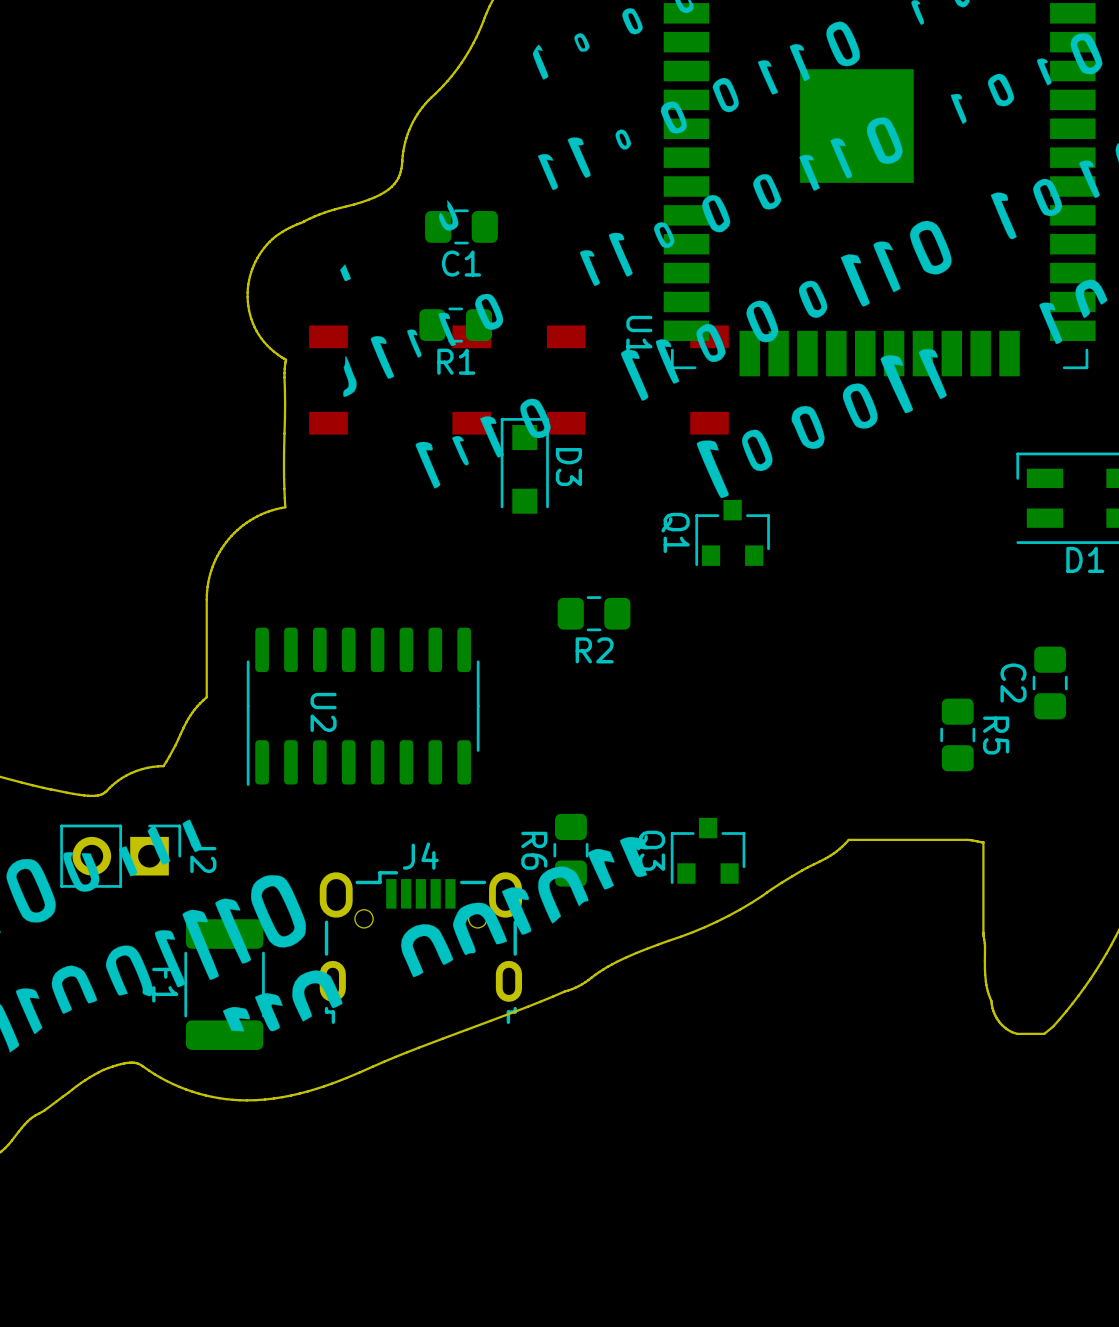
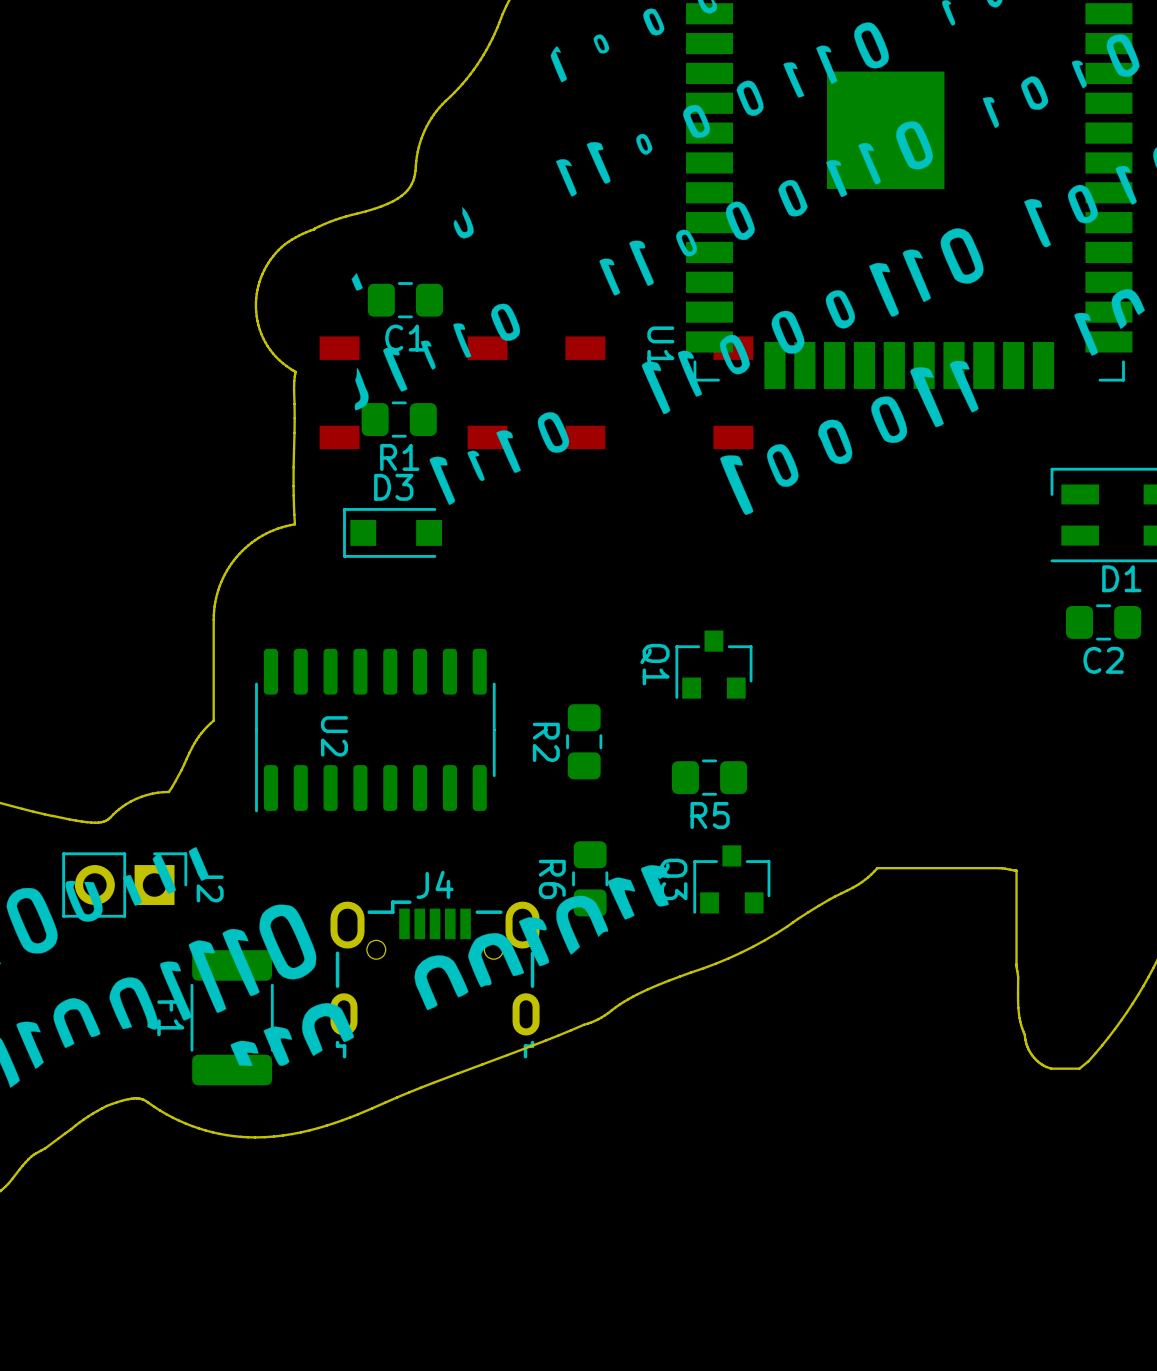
C1 position: (461, 226) -> (405, 300)
R1 position: (455, 325) -> (399, 419)
D3 rotation: 0° (524, 465) -> 90° counterclockwise (392, 532)
D3 position: (524, 465) -> (392, 532)
Q1 position: (732, 533) -> (713, 664)
R2 rotation: 0° (594, 613) -> 90° clockwise (584, 741)
R2 position: (594, 613) -> (584, 741)
C2 name position: C2 (1013, 683) -> C2 (1103, 660)
C2 rotation: 0° (1050, 683) -> 90° clockwise (1103, 622)
C2 position: (1050, 683) -> (1103, 622)
R5 rotation: 0° (957, 734) -> 90° clockwise (709, 777)
R5 position: (957, 734) -> (709, 777)

